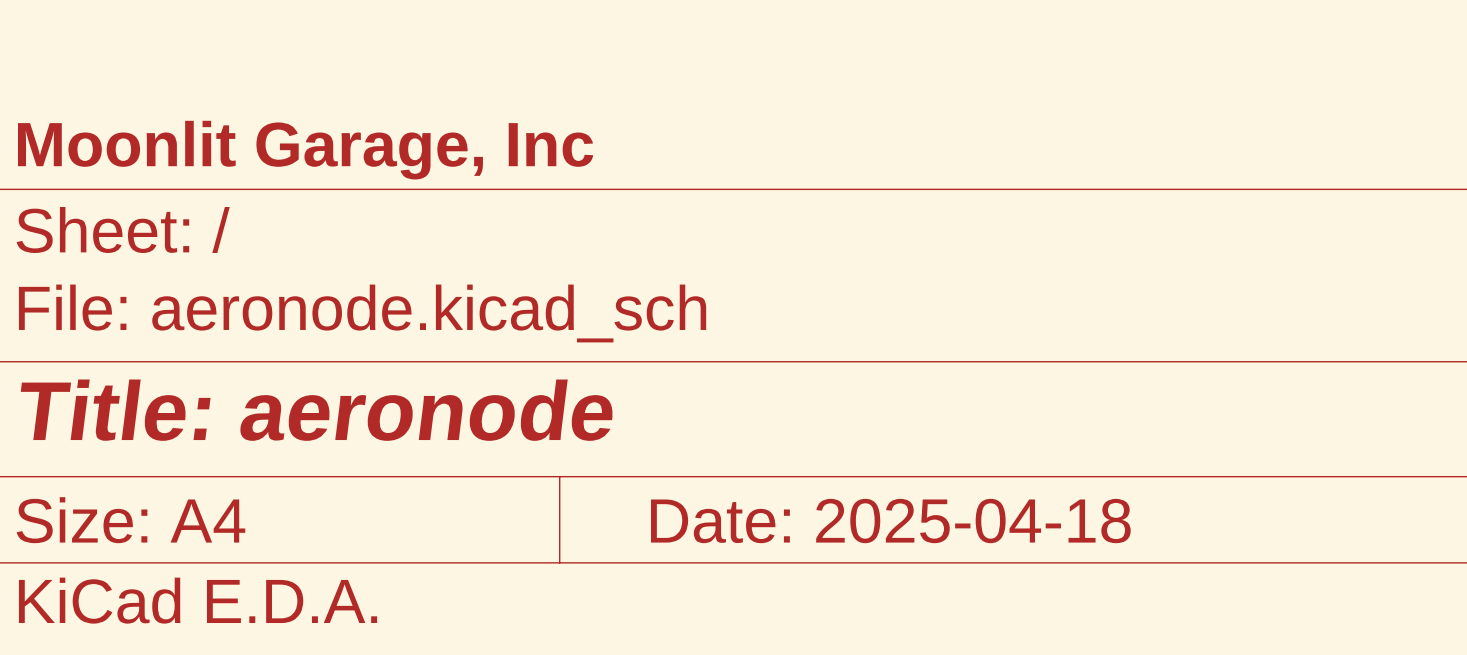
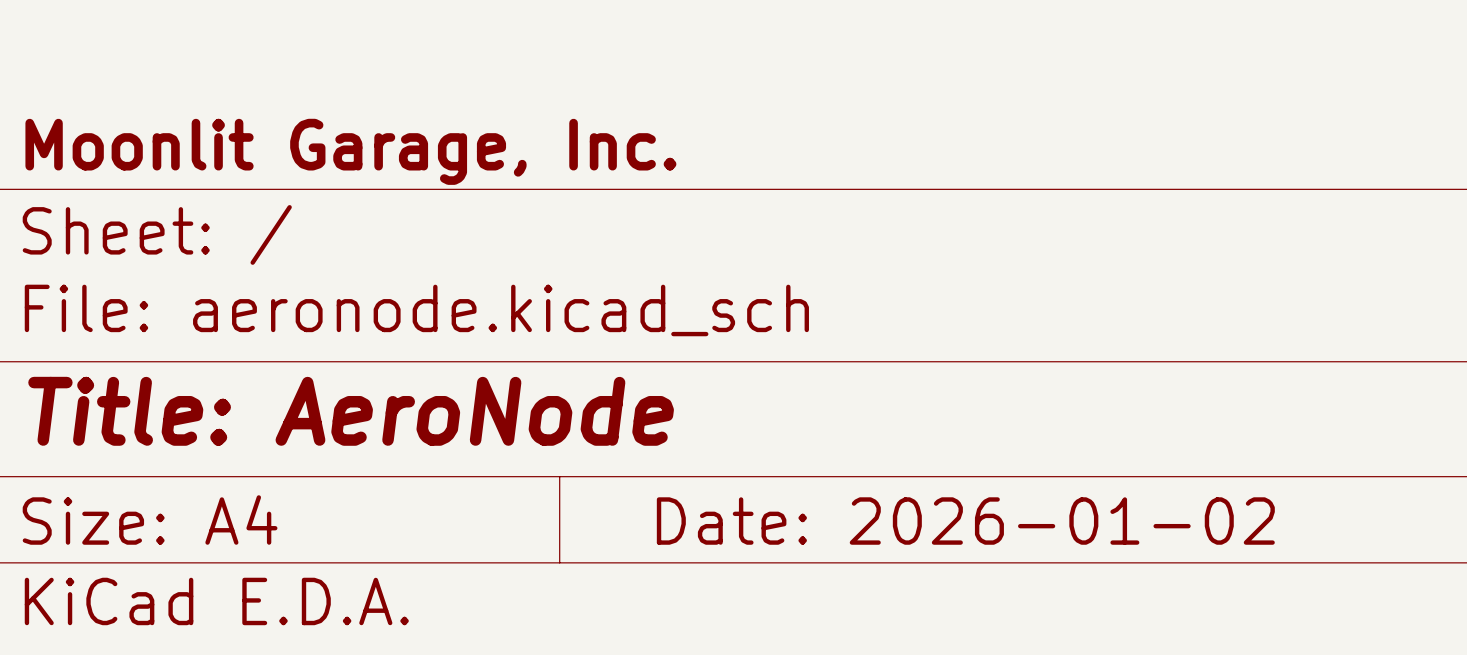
title block: Moonlit Garage, Inc (305, 150) -> Moonlit Garage, Inc. (350, 151)
title block: Title: aeronode (317, 410) -> Title: AeroNode (351, 411)
title block: Date: 2025-04-18 (890, 521) -> Date: 2026-01-02 (965, 521)

